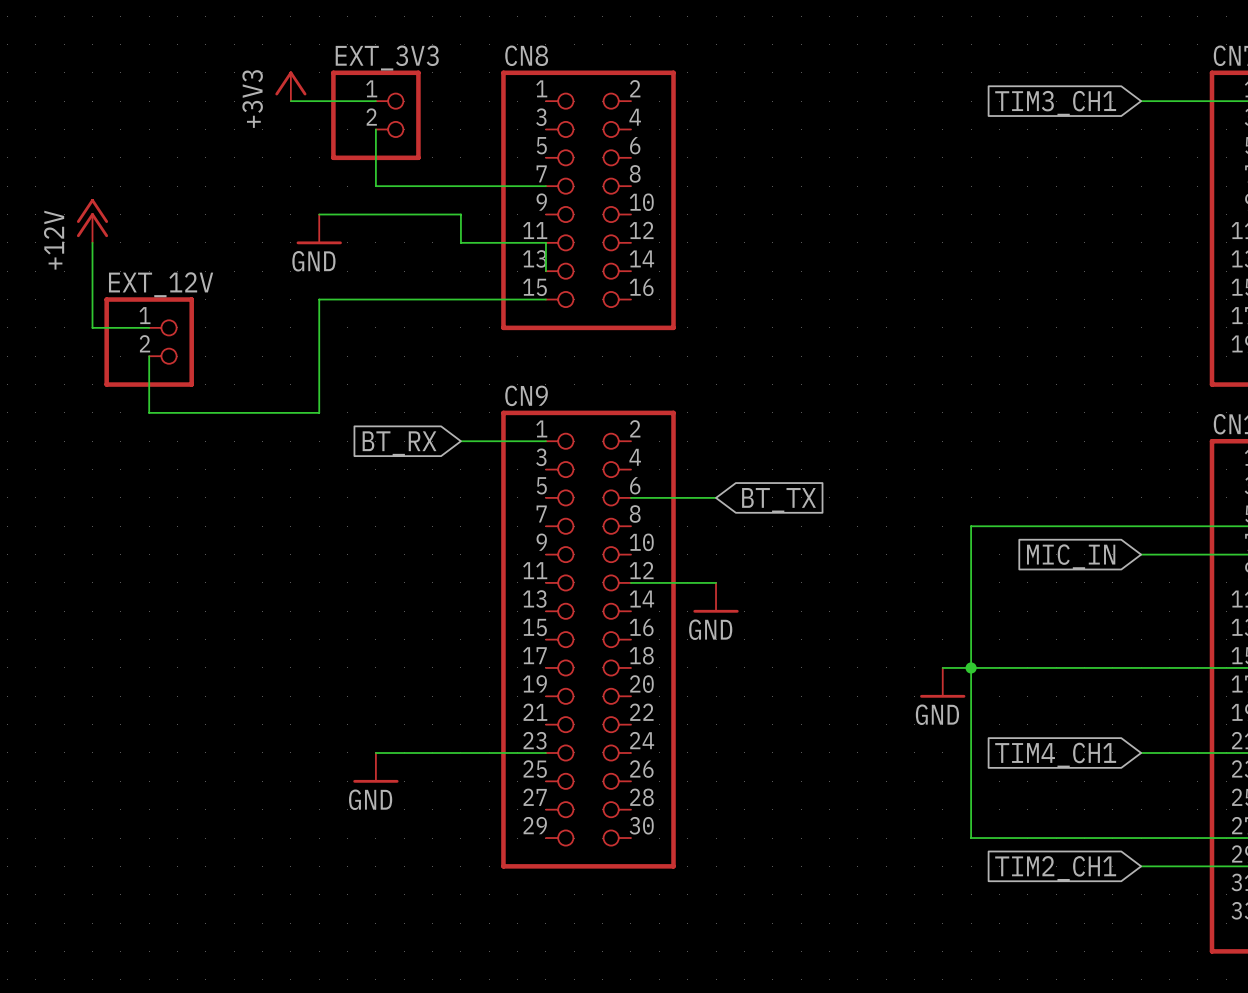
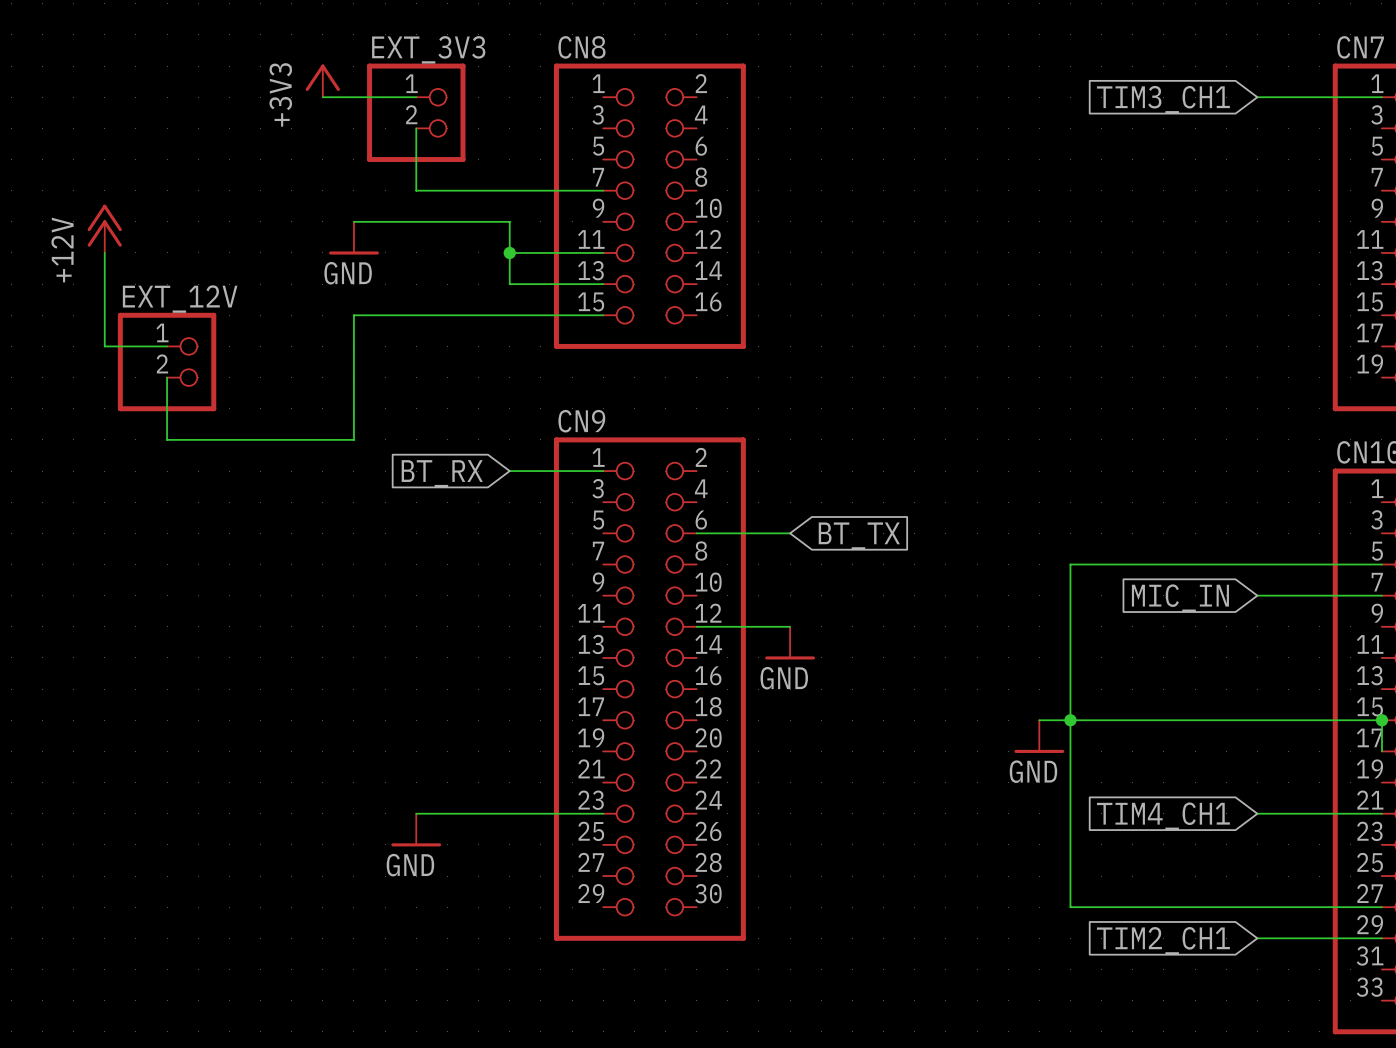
junction: none -> (509, 252)
wire: (545, 242) (545, 271) -> (509, 252) (509, 284) (603, 284)

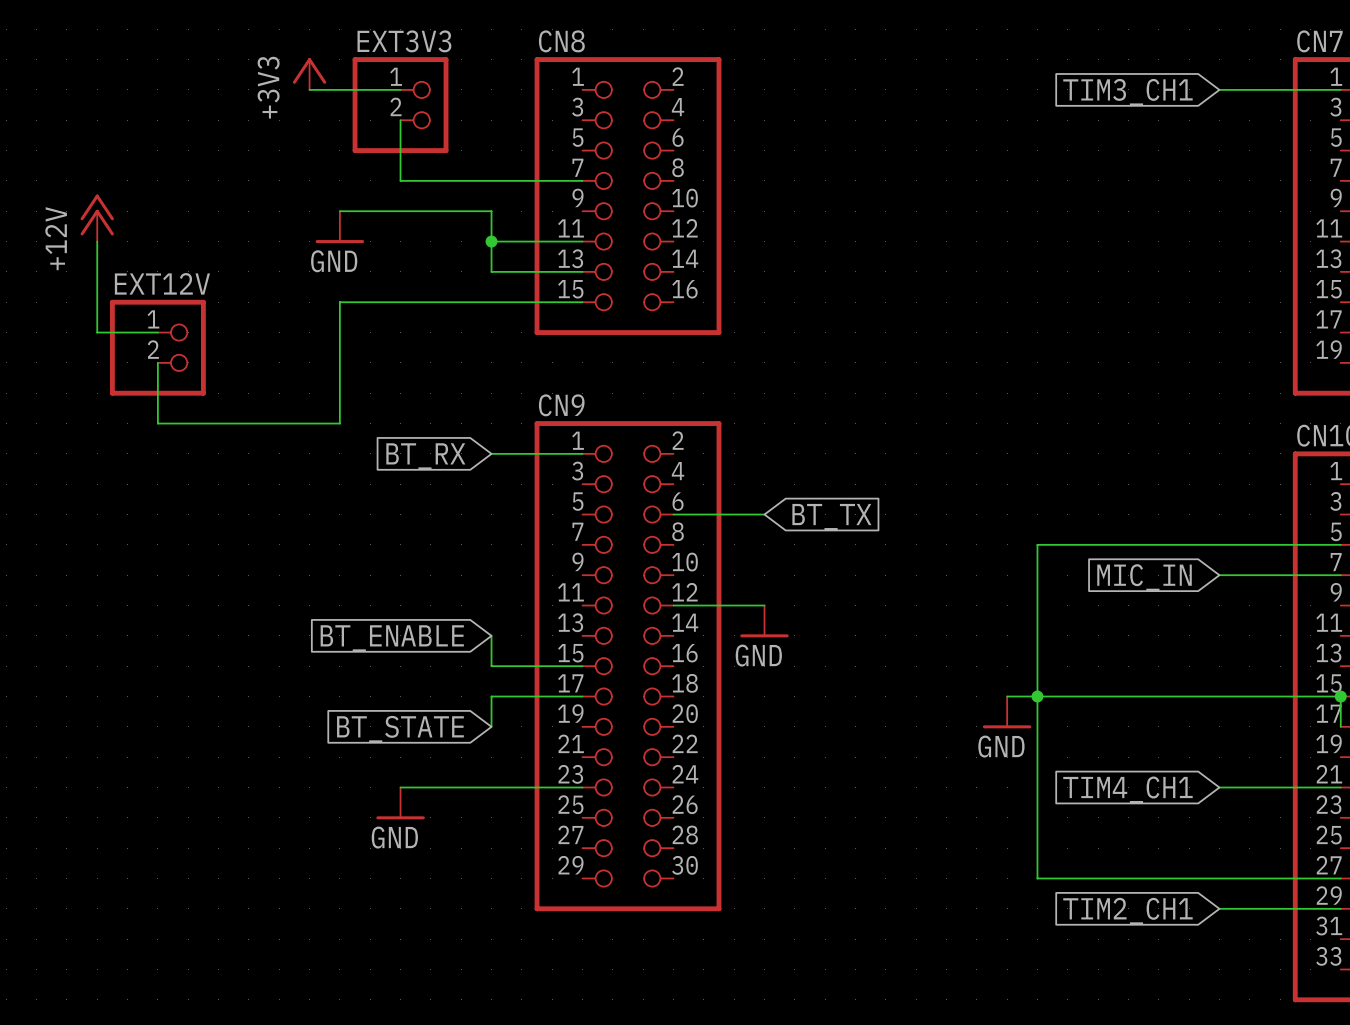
EXT_3V3 name: EXT_3V3 (428, 49) -> EXT3V3 (404, 41)
EXT_12V name: EXT_12V (180, 299) -> EXT12V (162, 283)
wire: none -> (491, 635) (491, 666) (582, 666)
global label: none -> BT_ENABLE (392, 638)
wire: none -> (582, 696) (491, 696) (491, 726)
global label: none -> BT_STATE (400, 729)

